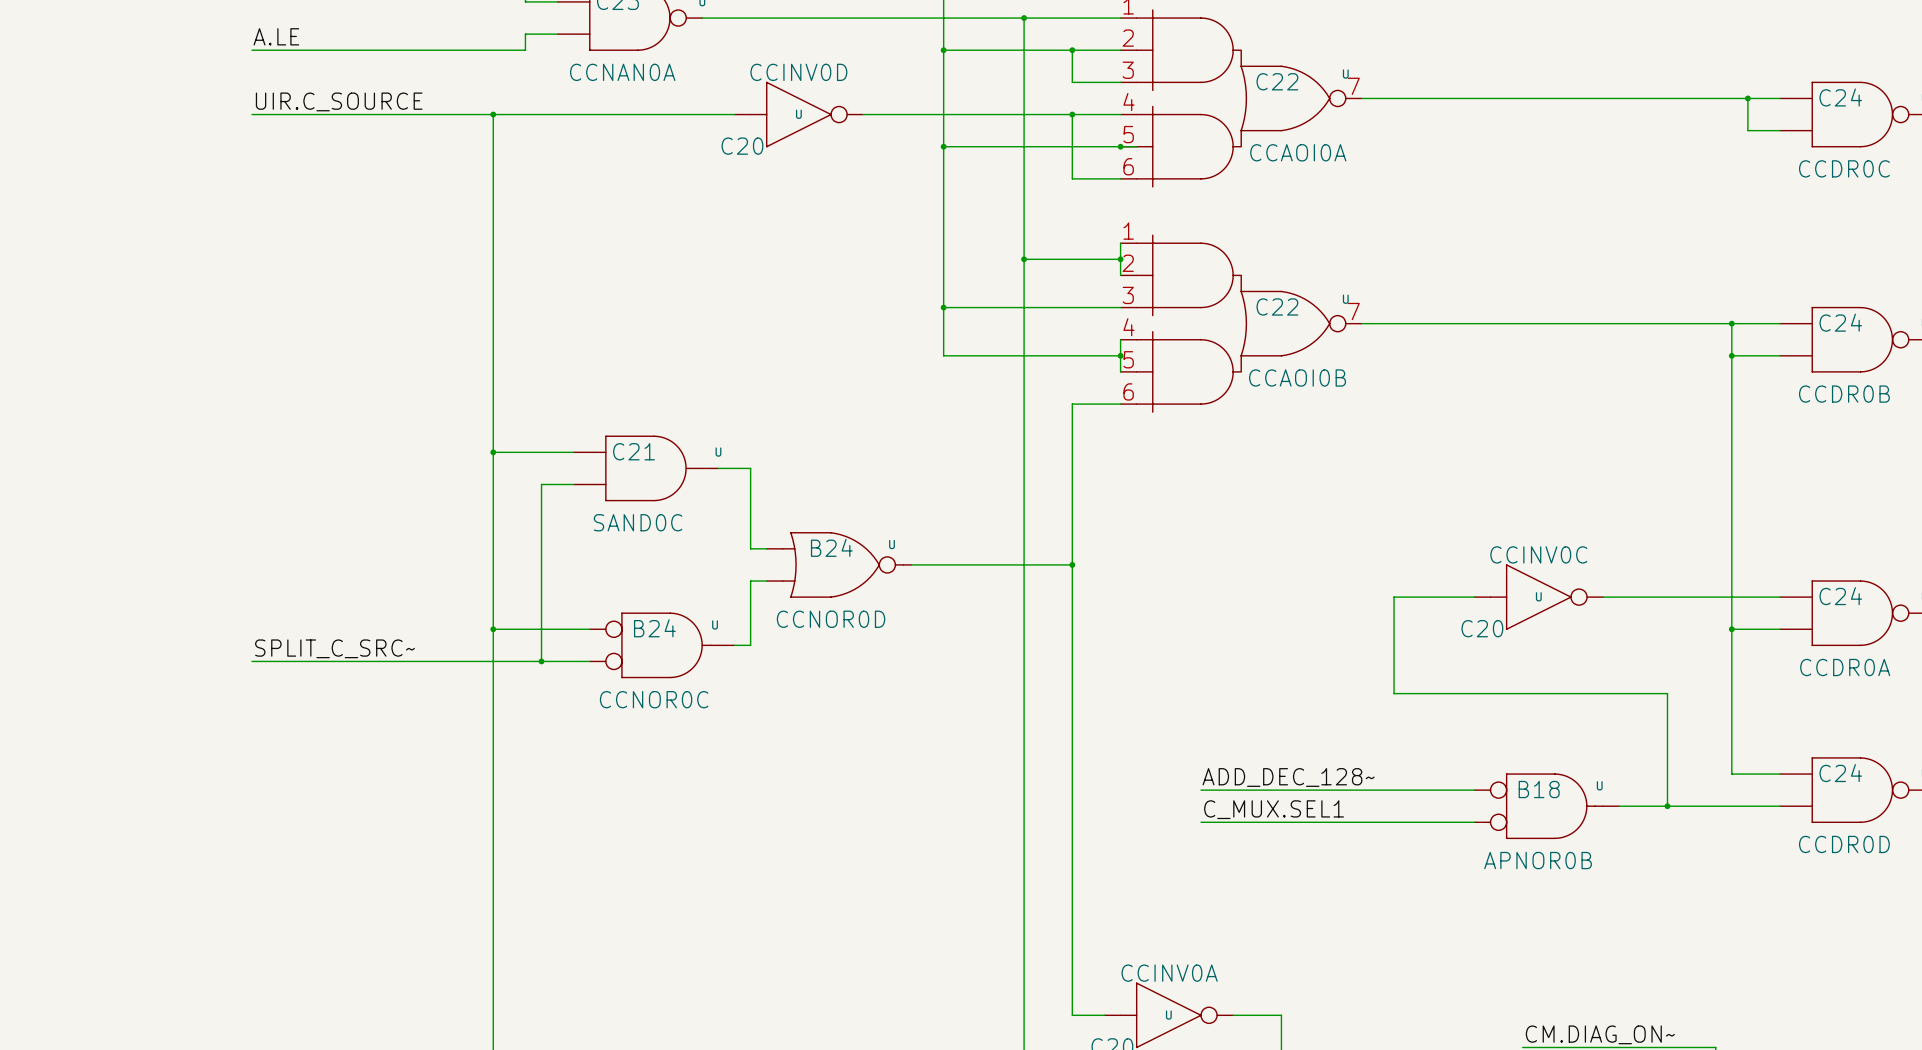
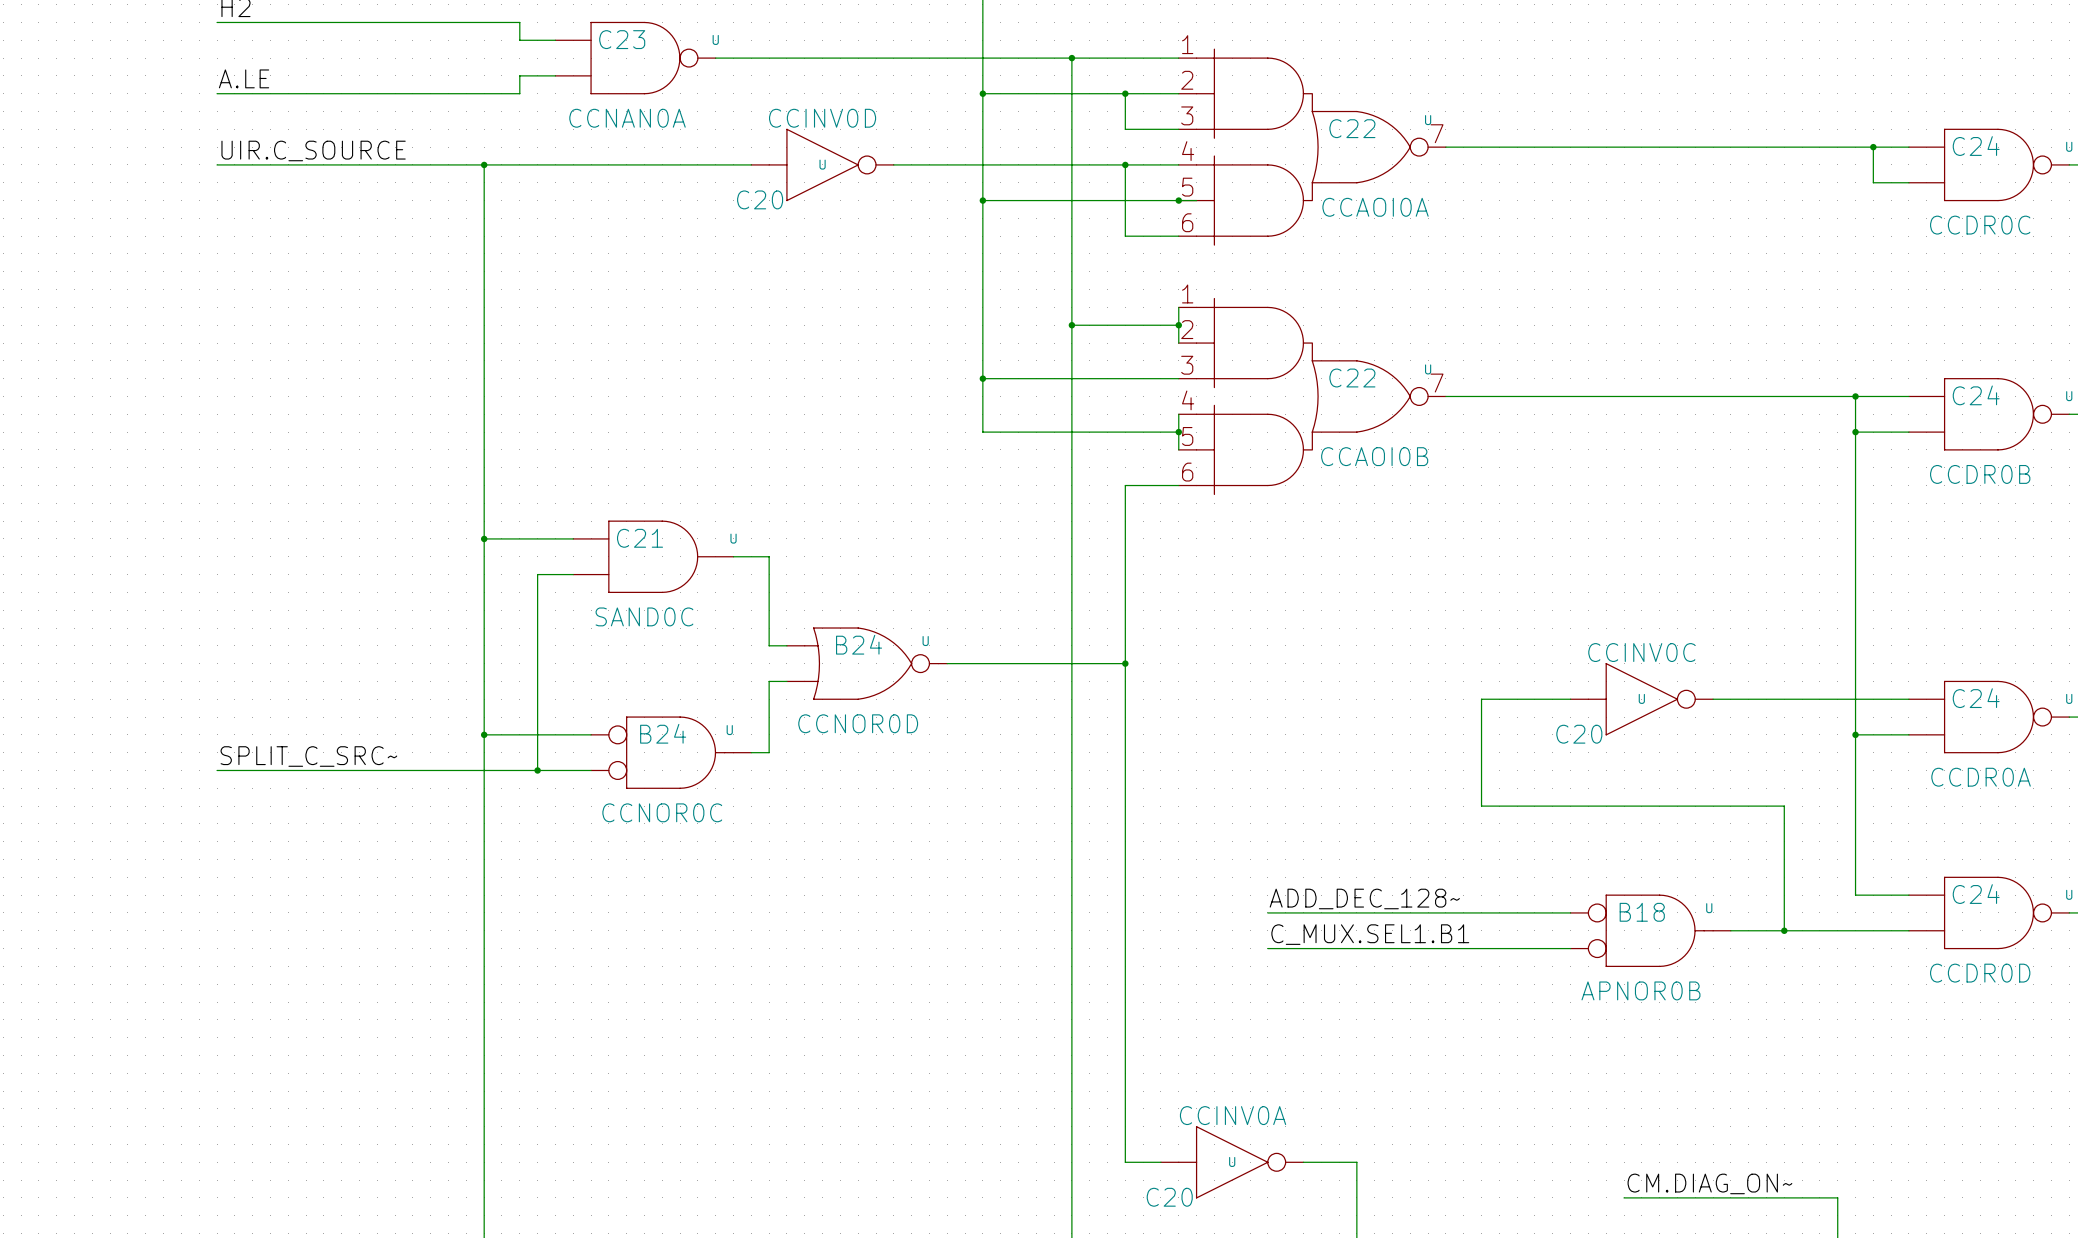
label: C_MUX.SEL1 (1274, 809) -> C_MUX.SEL1.B1 (1370, 934)

